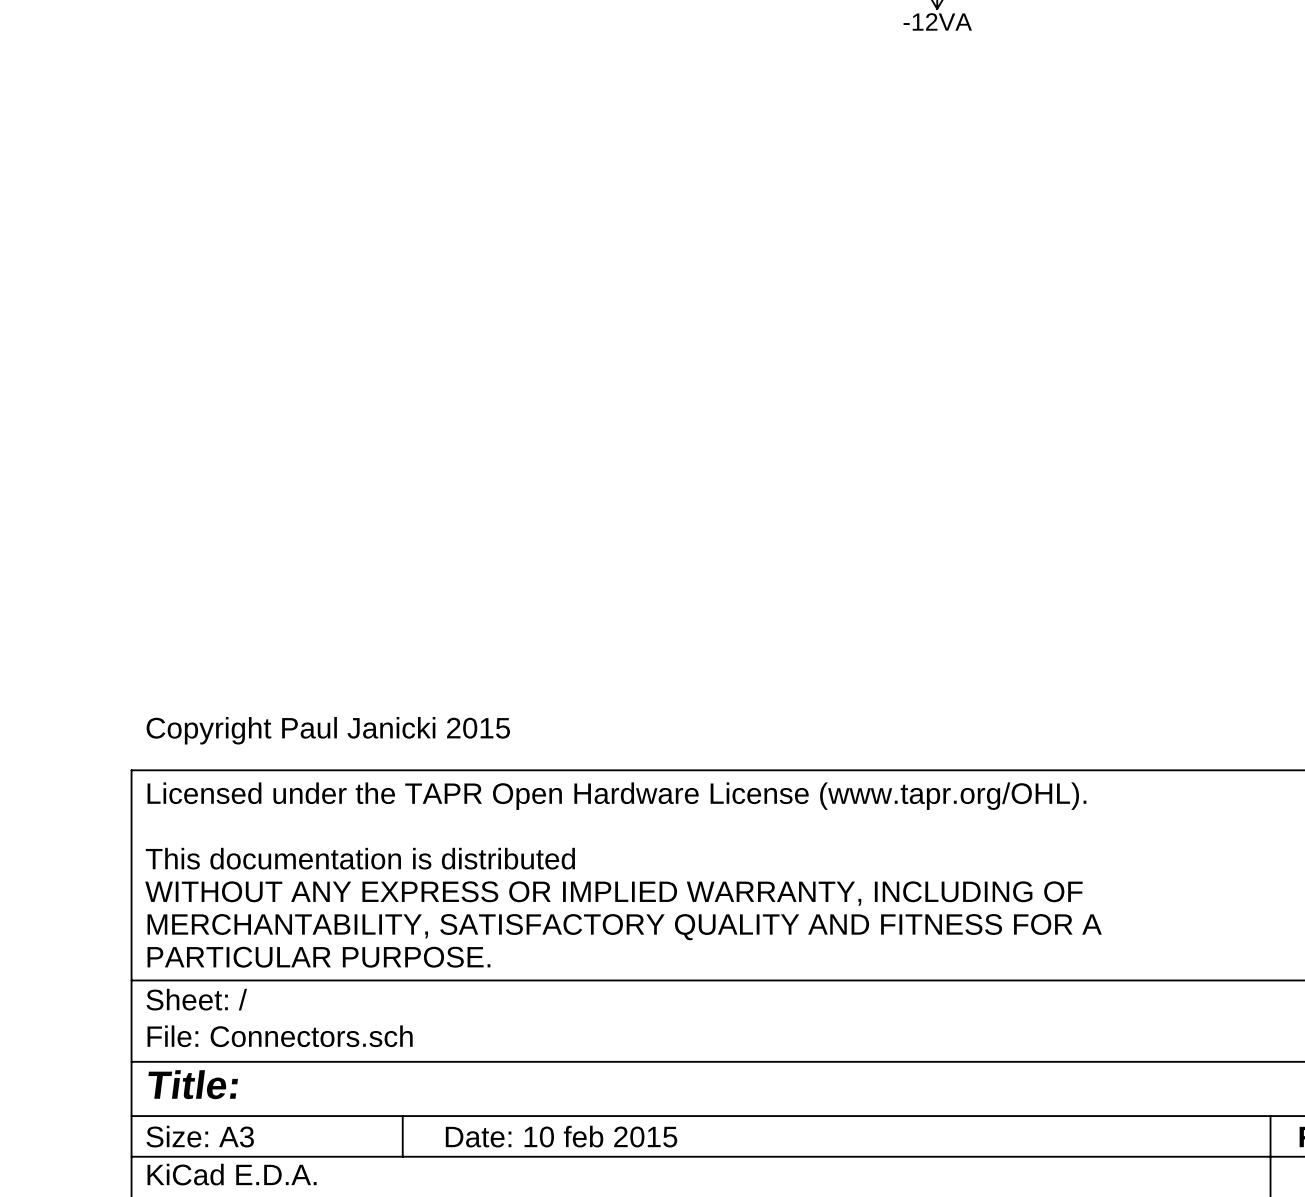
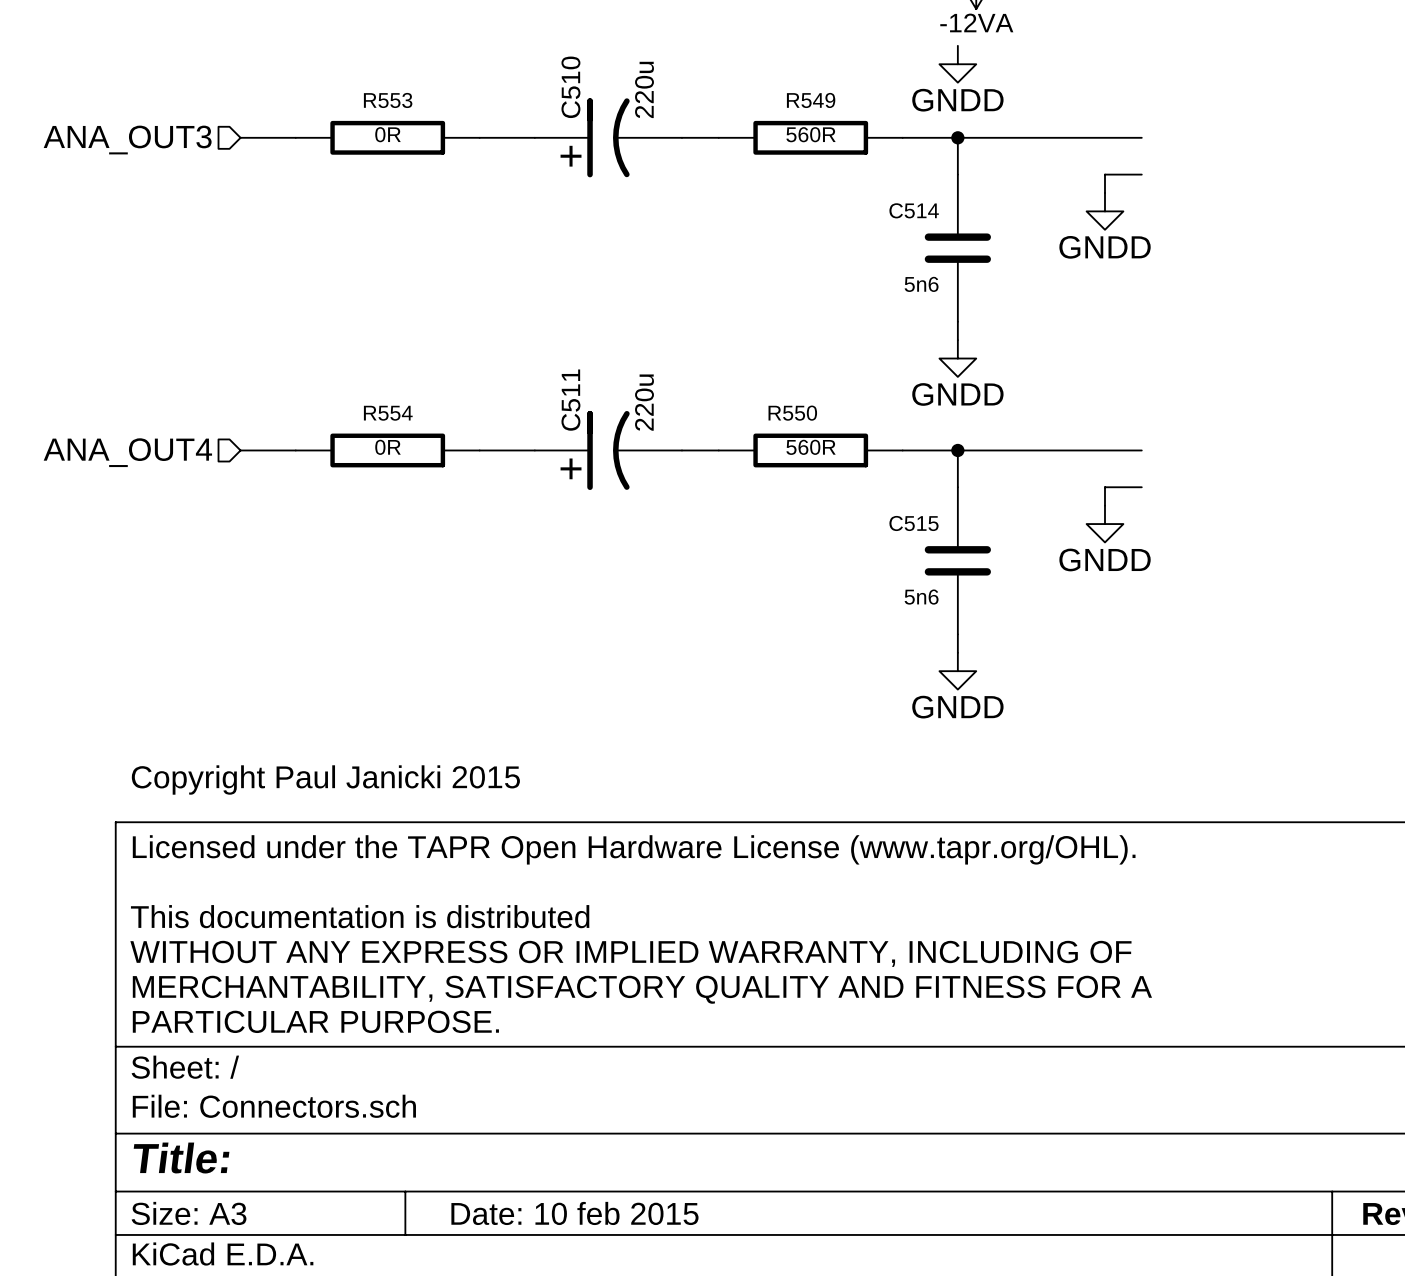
power symbol: none -> GNDD (957, 64)
wire: none -> (240, 137) (295, 137)
R553: none -> 0R (387, 137)
wire: none -> (479, 137) (534, 137)
C510: none -> 220u (608, 137)
wire: none -> (681, 137) (718, 137)
R549: none -> 560R (810, 137)
wire: none -> (902, 137) (1141, 137)
wire: none -> (957, 137) (957, 174)
junction: none -> (957, 137)
hierarchical label: none -> ANA_OUT3 (127, 140)
wire: none -> (1141, 174) (1104, 174) (1104, 192)
power symbol: none -> GNDD (1104, 211)
C514: none -> 5n6 (957, 248)
wire: none -> (957, 321) (957, 340)
power symbol: none -> GNDD (957, 358)
wire: none -> (240, 450) (295, 450)
R554: none -> 0R (387, 450)
wire: none -> (479, 450) (534, 450)
C511: none -> 220u (608, 450)
wire: none -> (681, 450) (718, 450)
R550: none -> 560R (810, 450)
wire: none -> (902, 450) (1141, 450)
wire: none -> (957, 450) (957, 487)
junction: none -> (957, 450)
hierarchical label: none -> ANA_OUT4 (127, 452)
wire: none -> (1141, 487) (1104, 487) (1104, 505)
power symbol: none -> GNDD (1104, 524)
C515: none -> 5n6 (957, 560)
wire: none -> (957, 634) (957, 652)
power symbol: none -> GNDD (957, 671)

